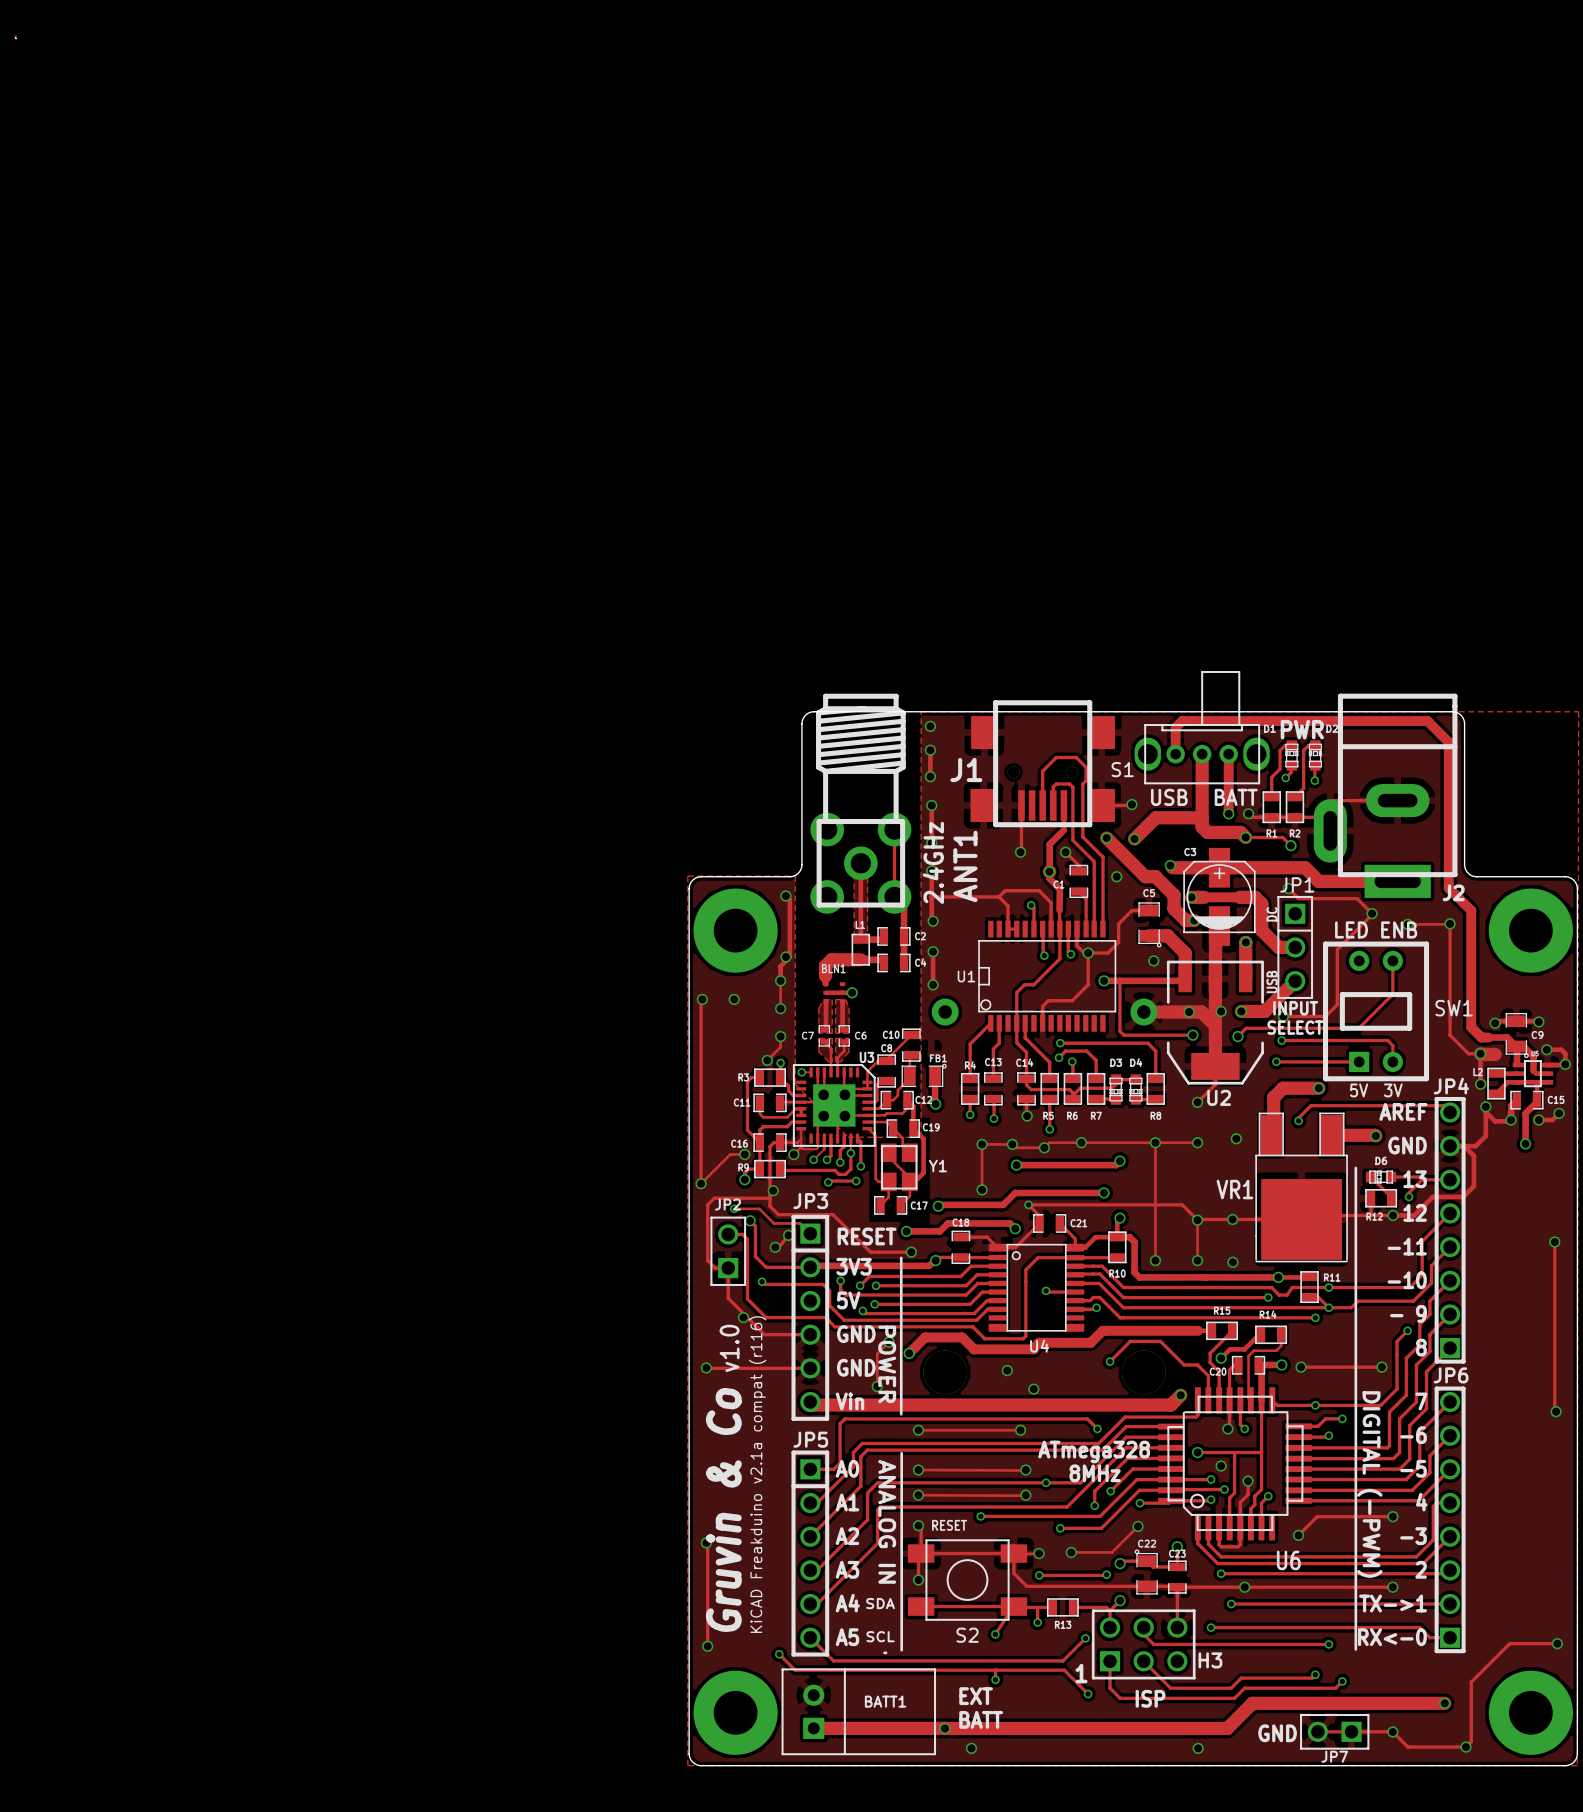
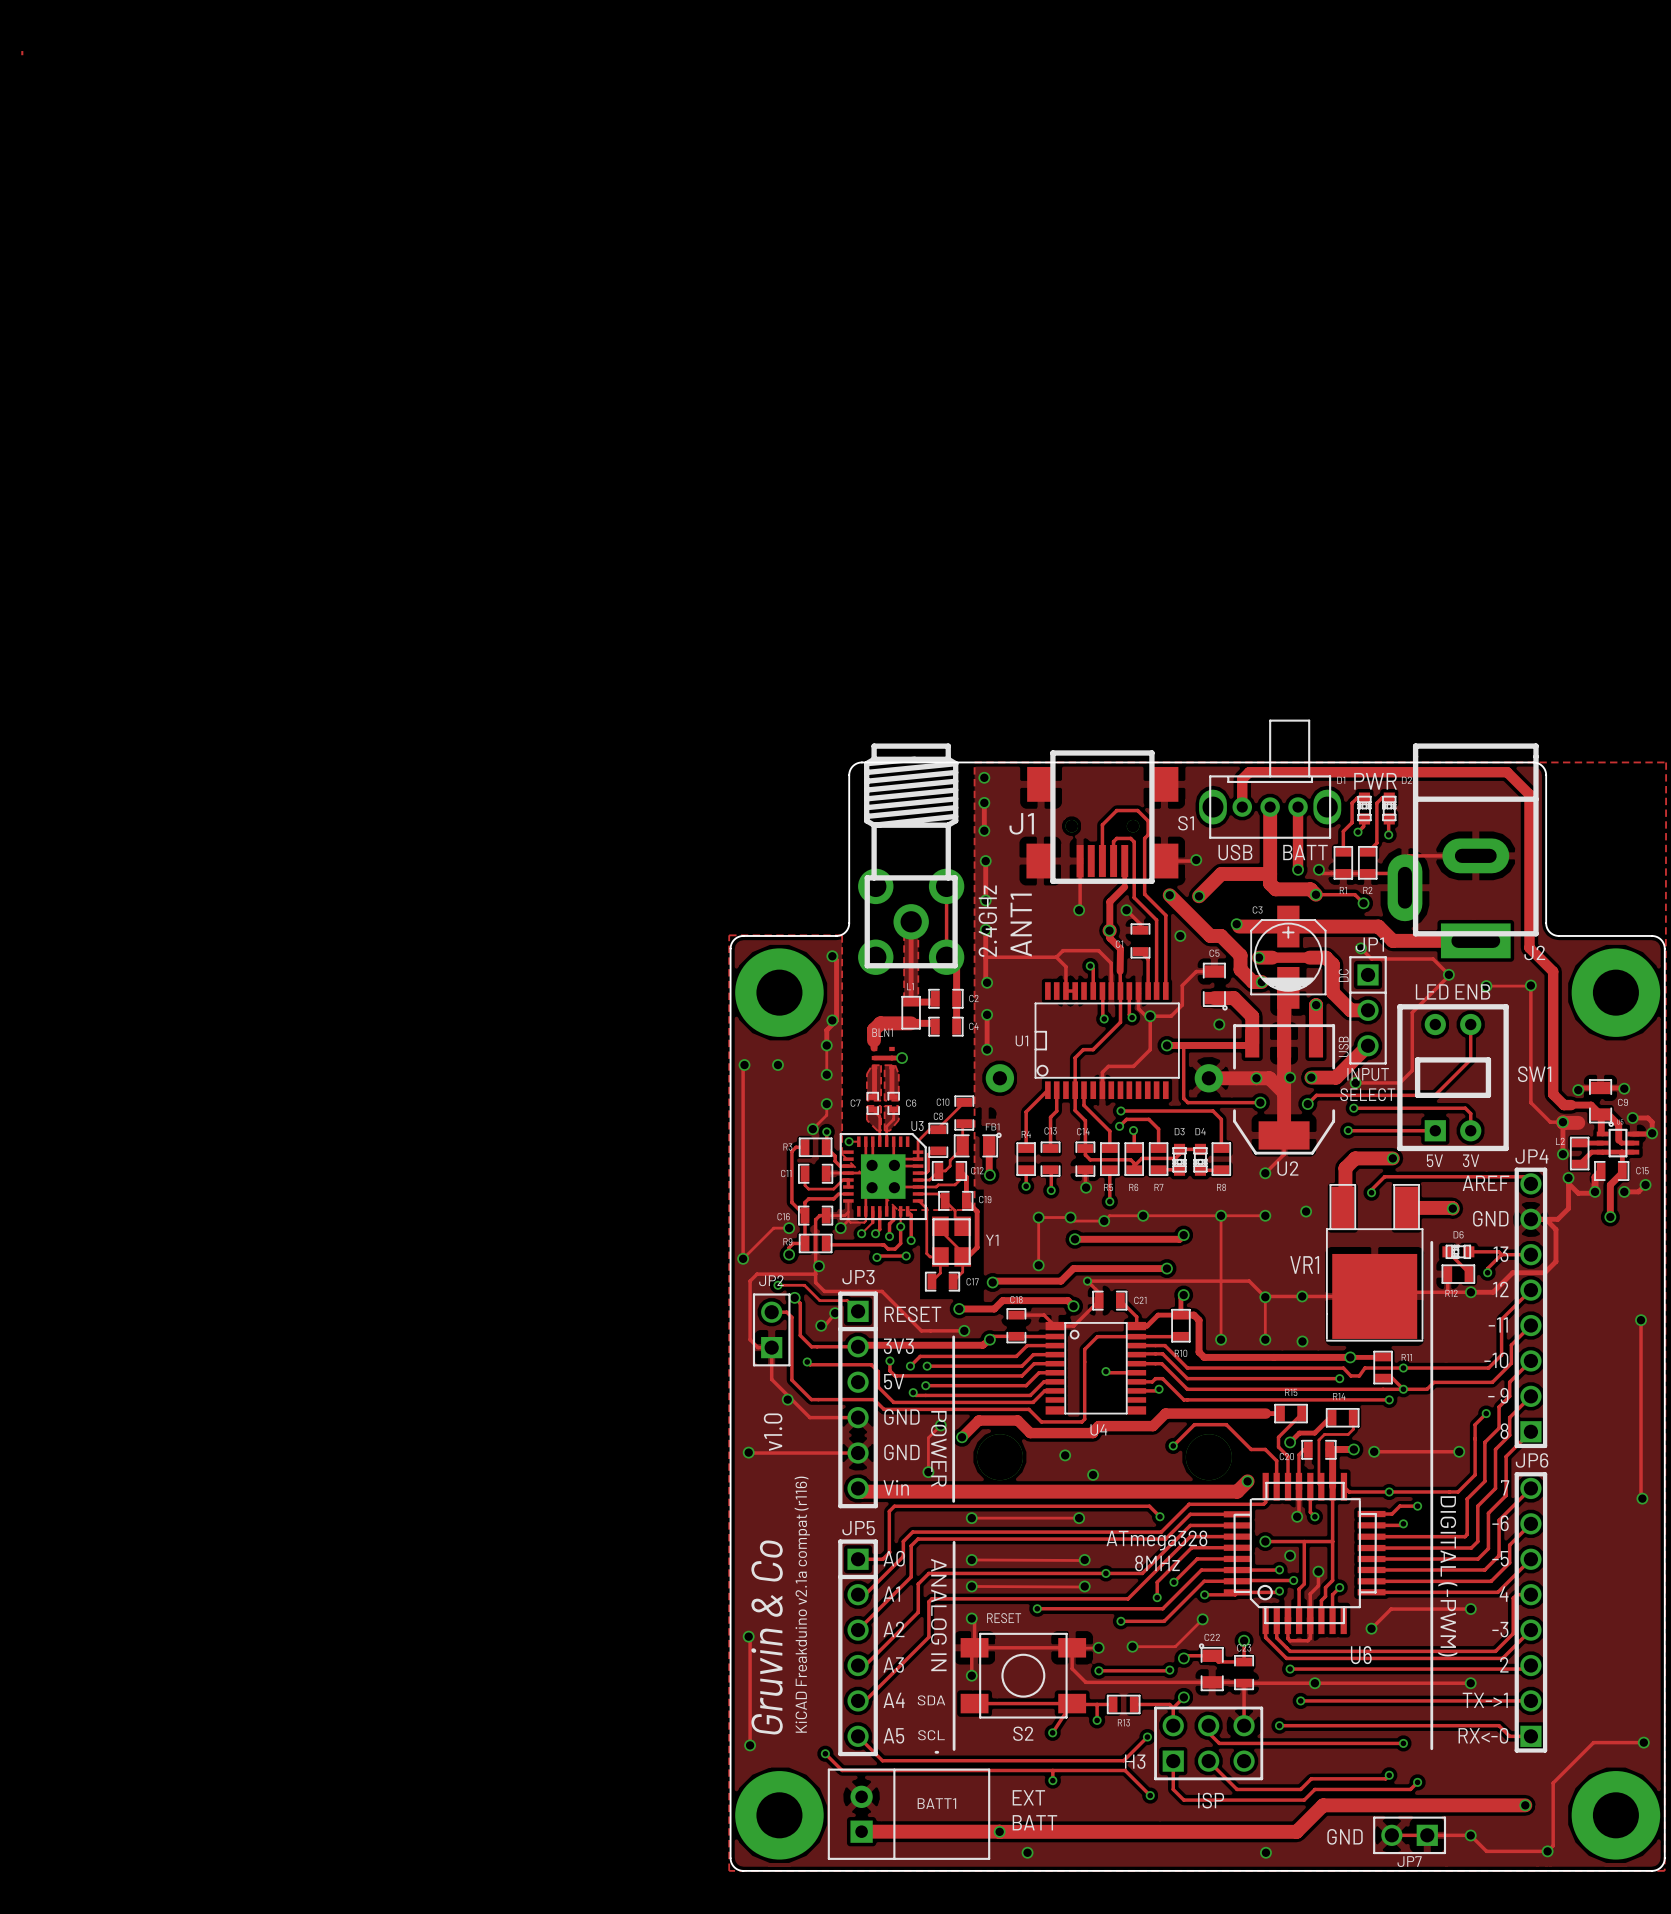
H3 name position: H3 (1210, 1660) -> H3 (1135, 1761)
text: 1 (1081, 1673) -> none

